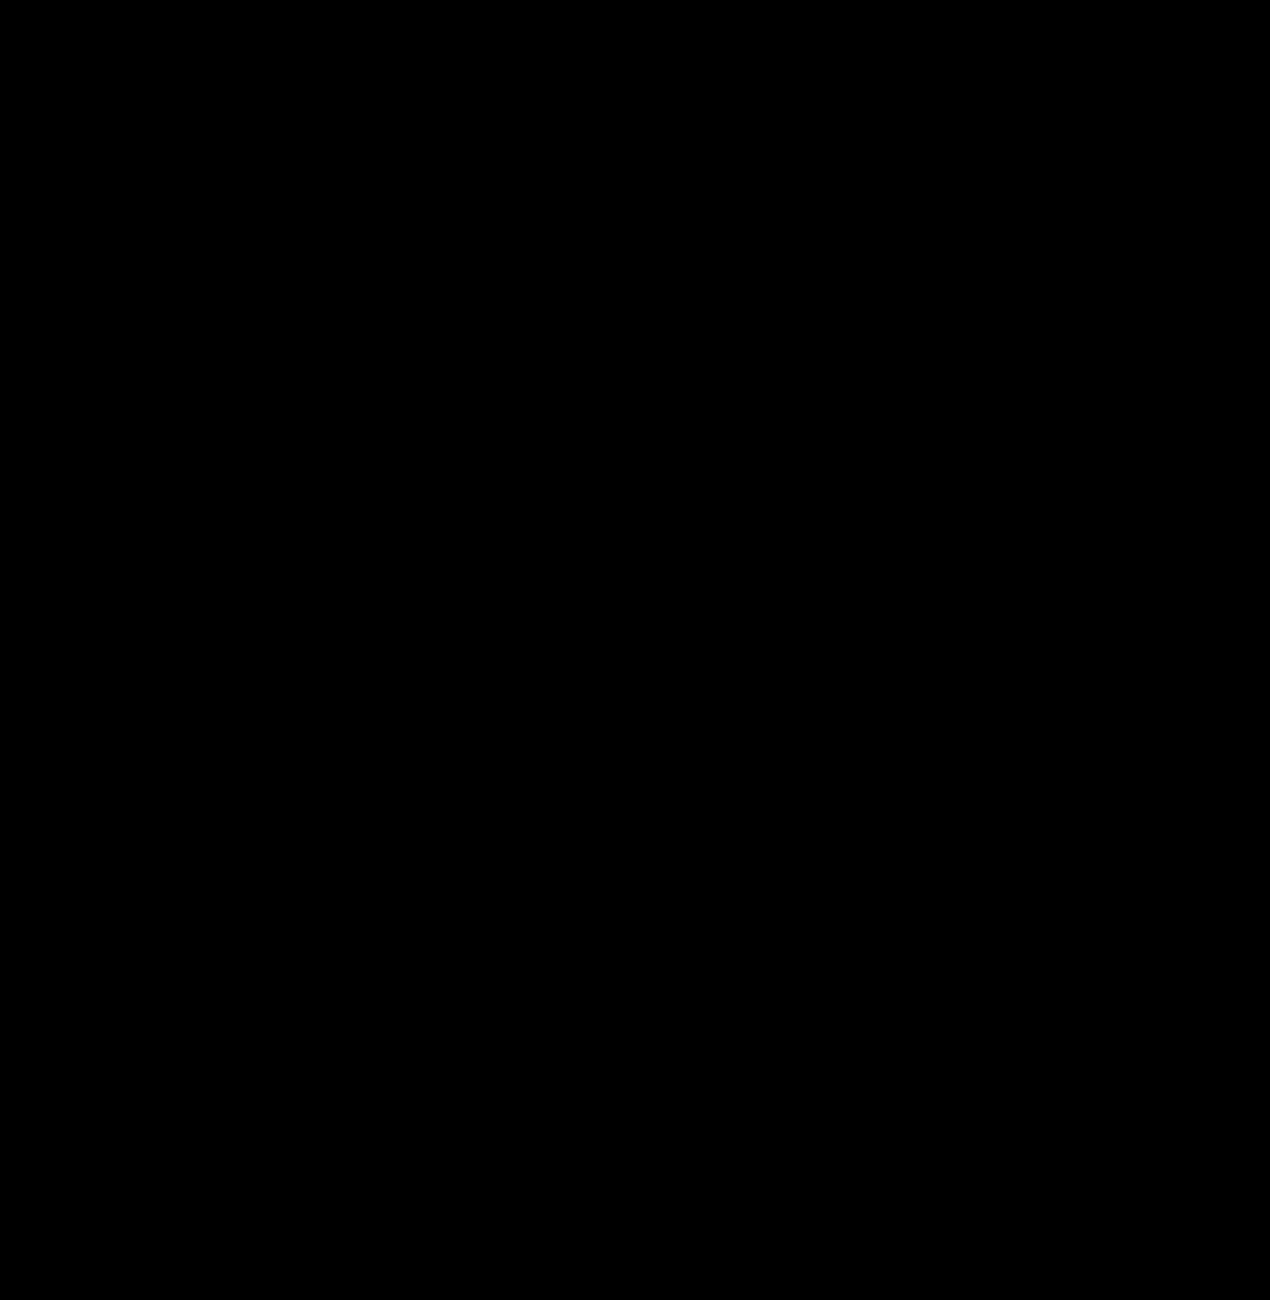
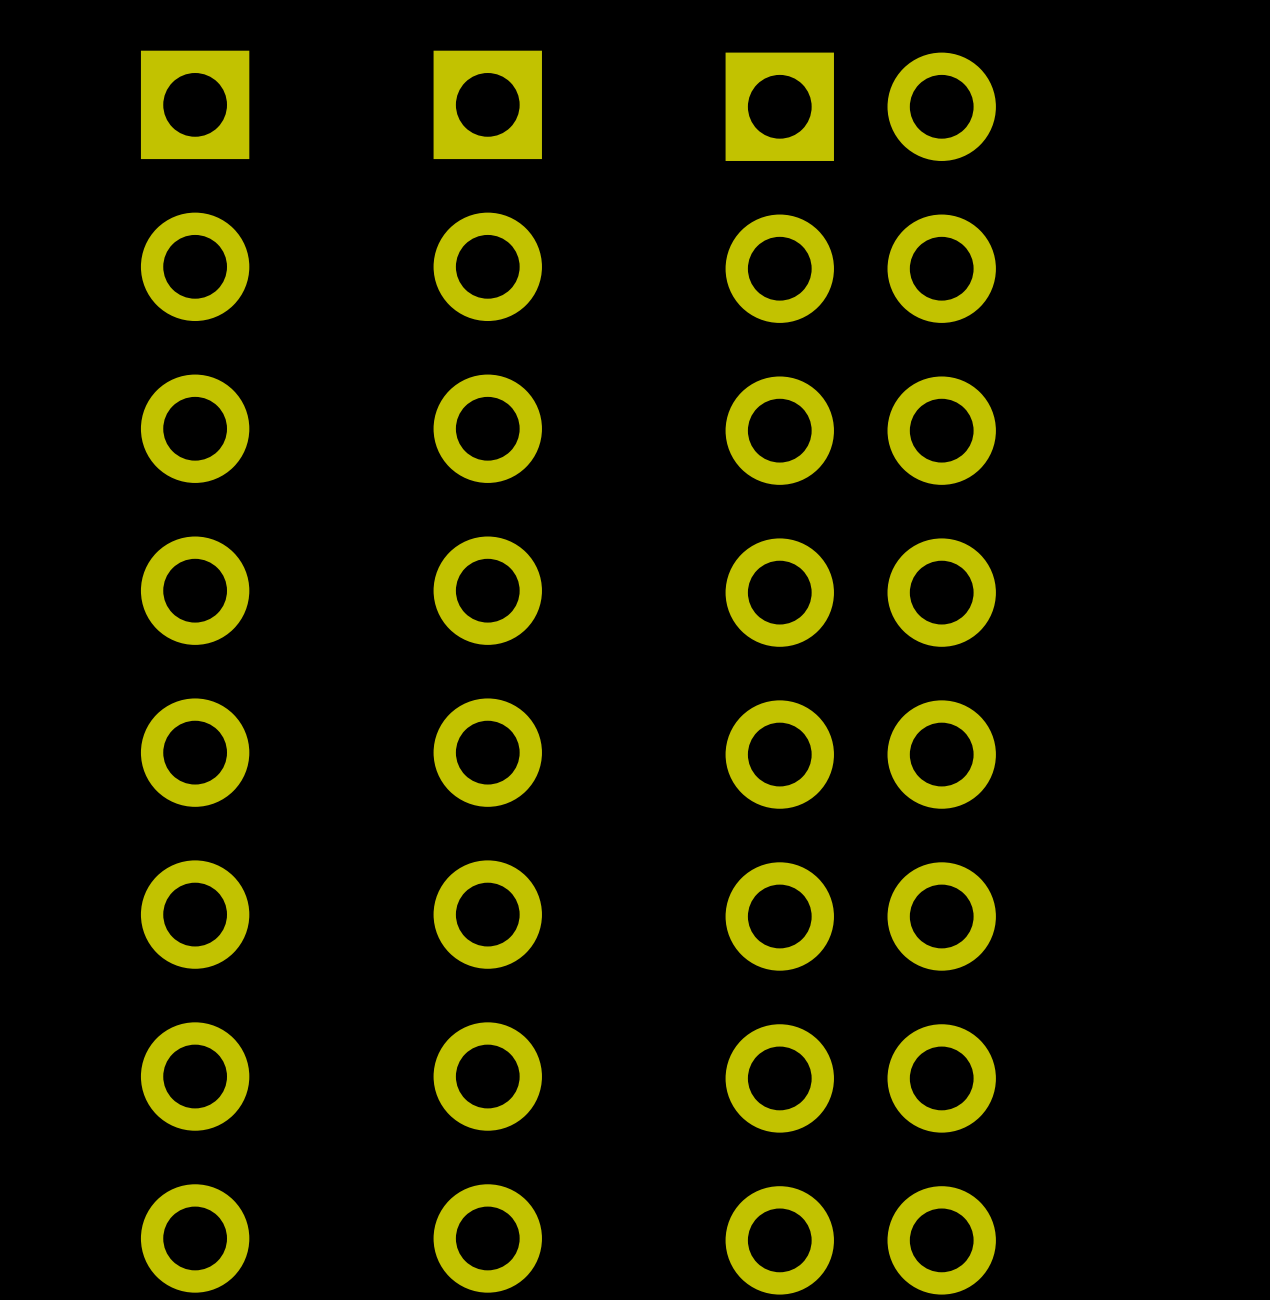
part: none -> (195, 671)
part: none -> (487, 671)
part: none -> (860, 673)

